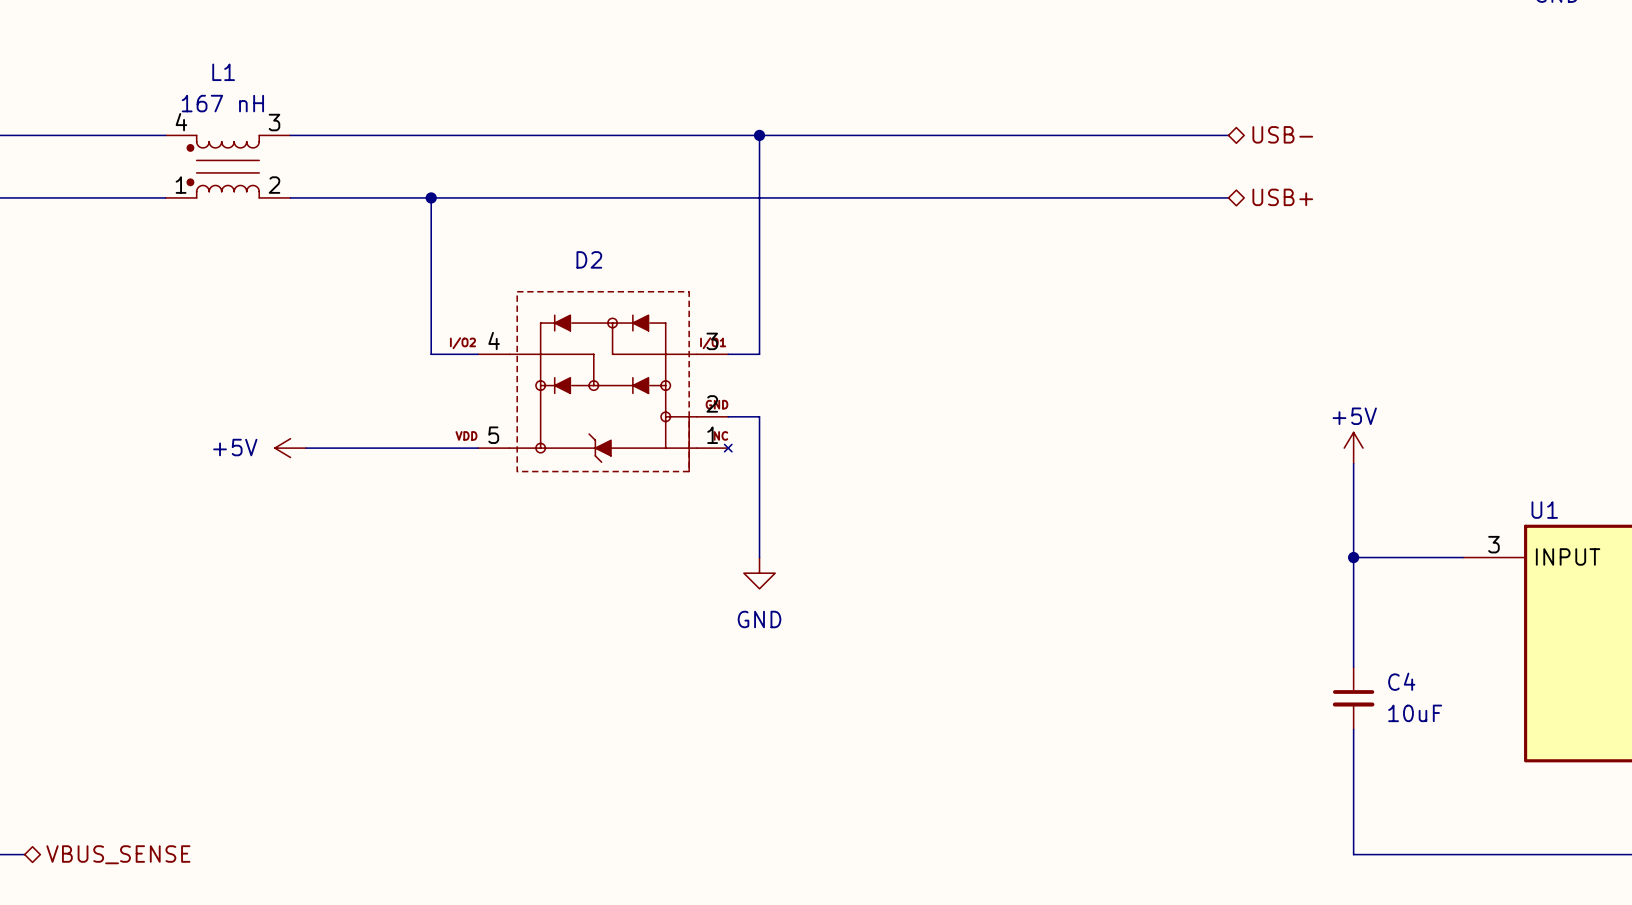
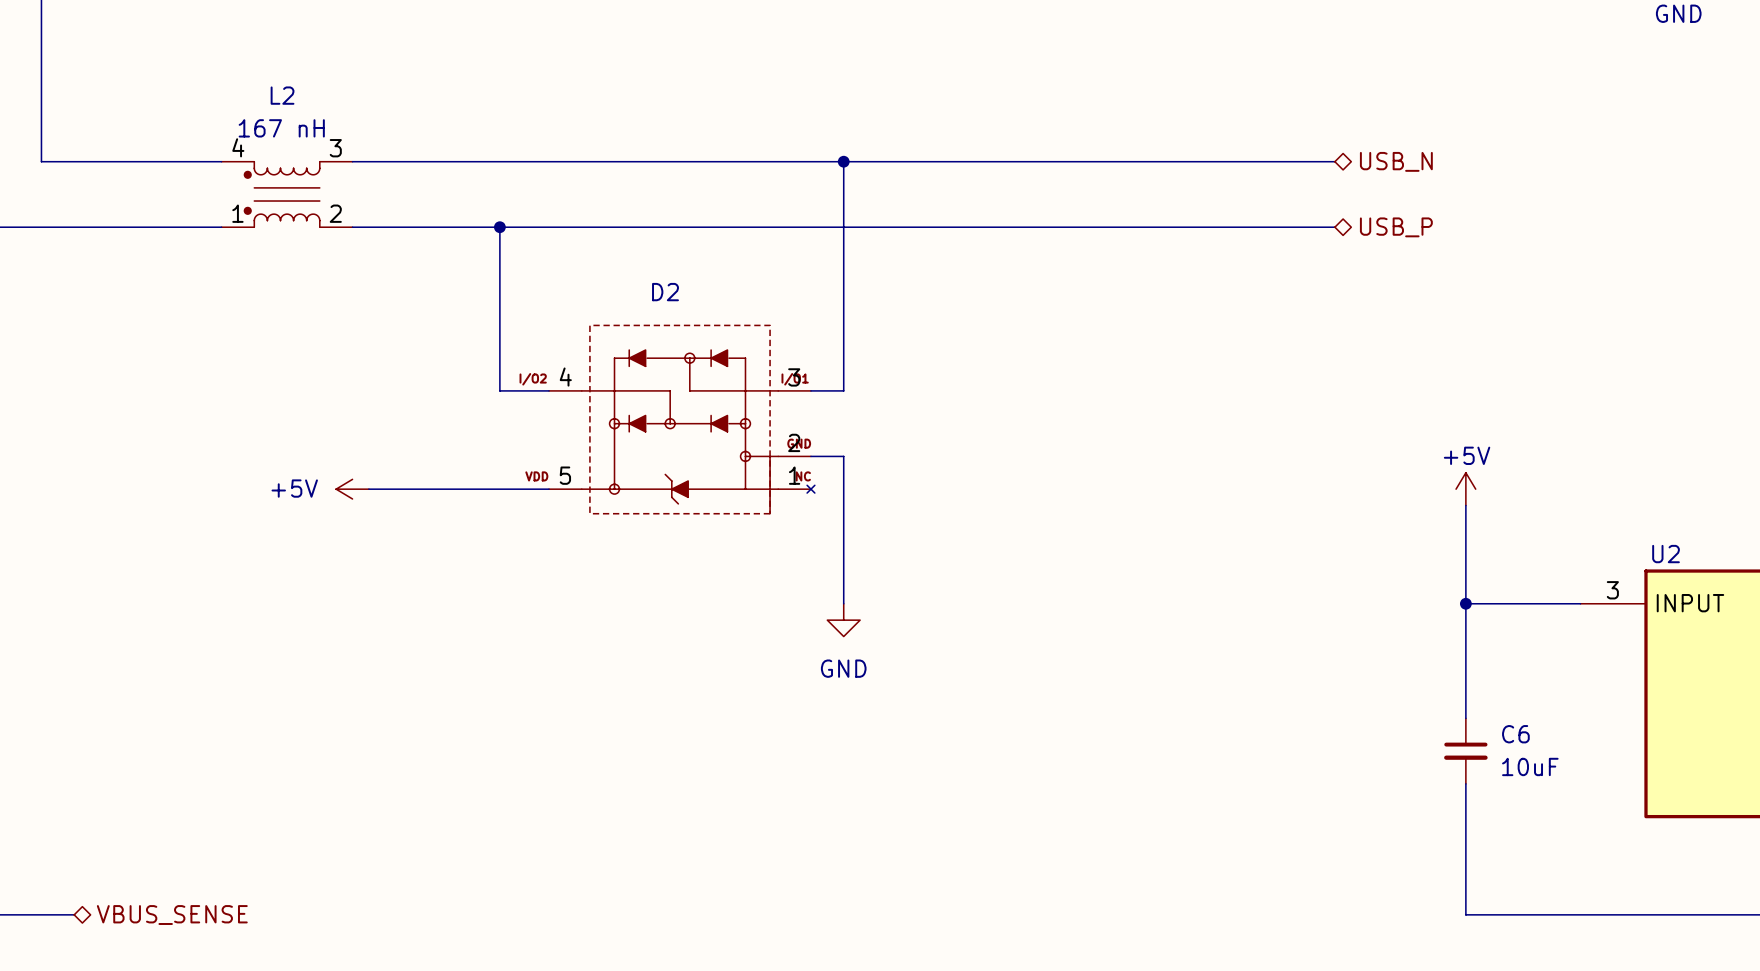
L1 name: L1 (223, 72) -> L2 (282, 95)
hierarchical label: USB- (1282, 134) -> USB_N (1396, 161)
hierarchical label: USB+ (1282, 197) -> USB_P (1396, 227)
U1 name: U1 (1544, 510) -> U2 (1666, 554)
C4 name: C4 (1401, 681) -> C6 (1515, 734)

